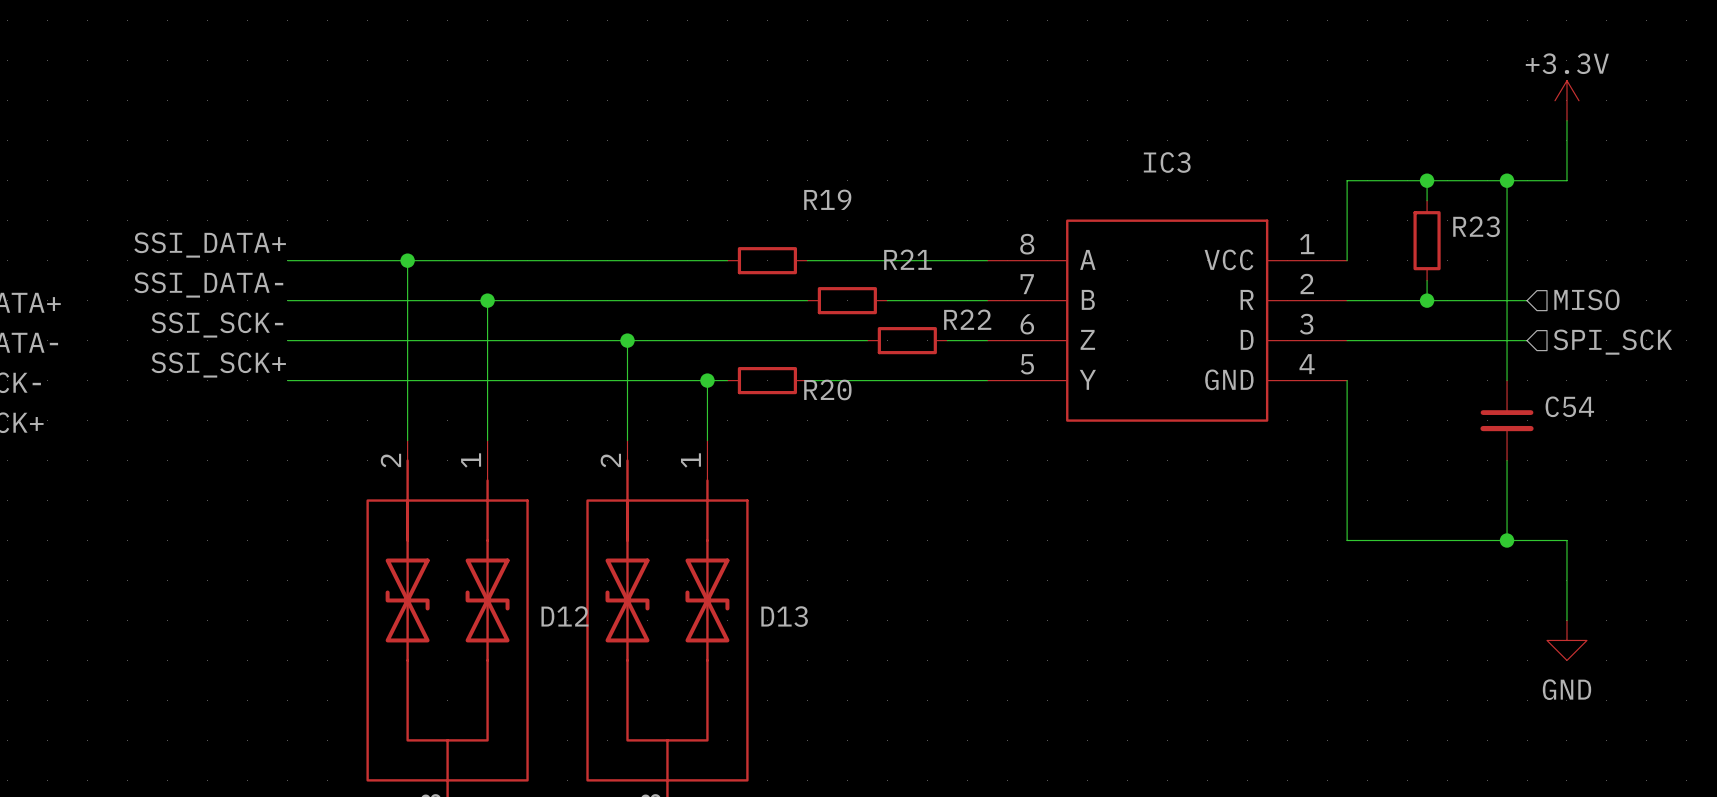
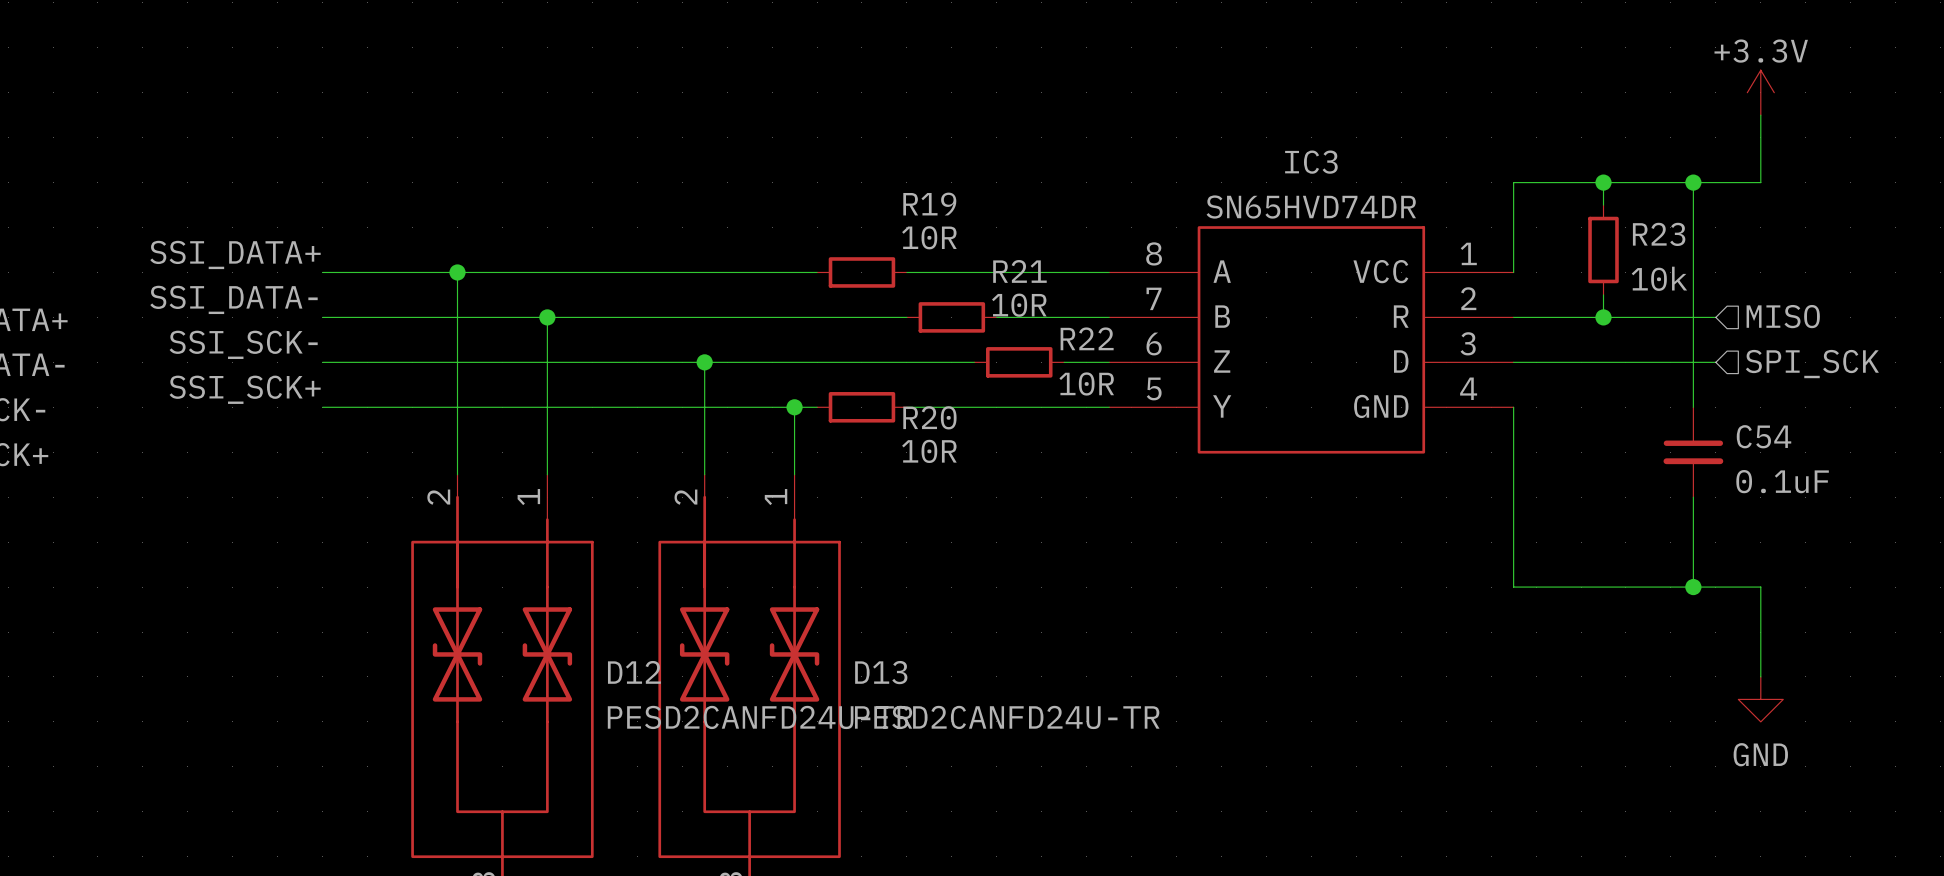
IC3 value: none -> SN65HVD74DR (1311, 207)
R19 value: none -> 10R (929, 237)
R23 value: none -> 10k (1659, 278)
R21 value: none -> 10R (1019, 305)
R22 value: none -> 10R (1086, 383)
R20 value: none -> 10R (929, 451)
C54 value: none -> 0.1uF (1782, 481)
D12 value: none -> PESD2CANFD24U-TR (760, 717)
D13 value: none -> PESD2CANFD24U-TR (1007, 717)

